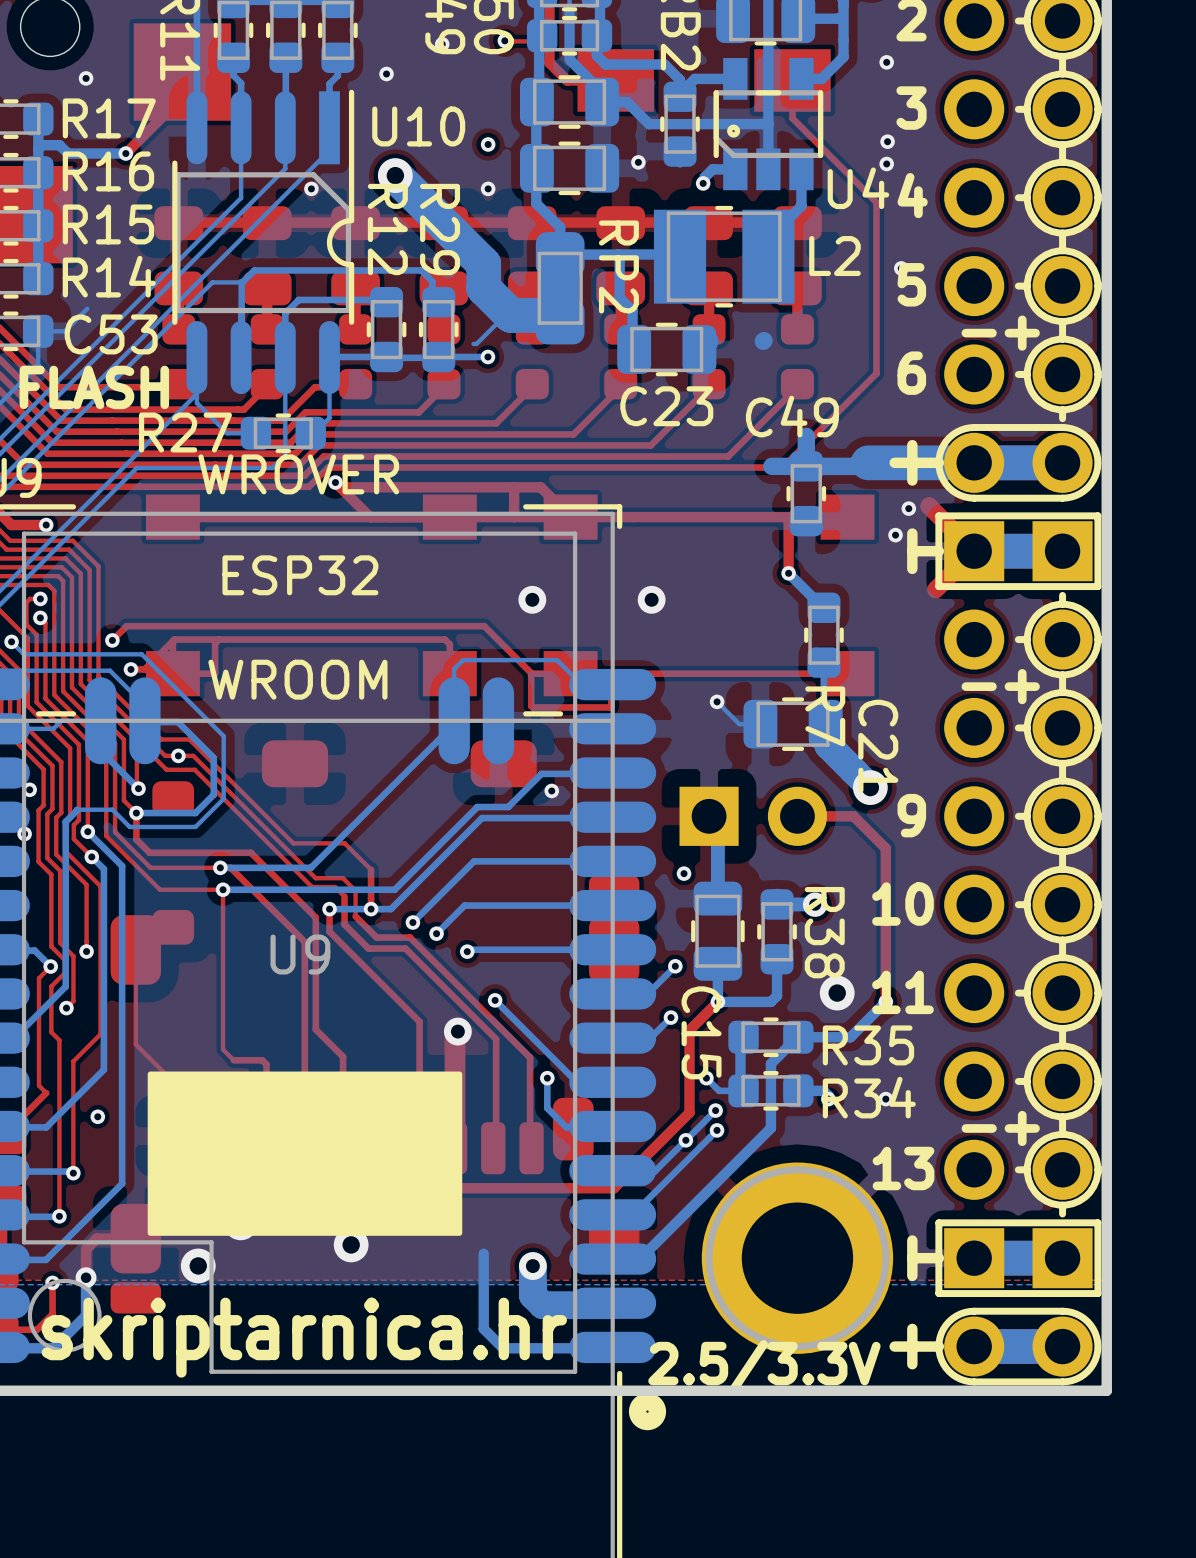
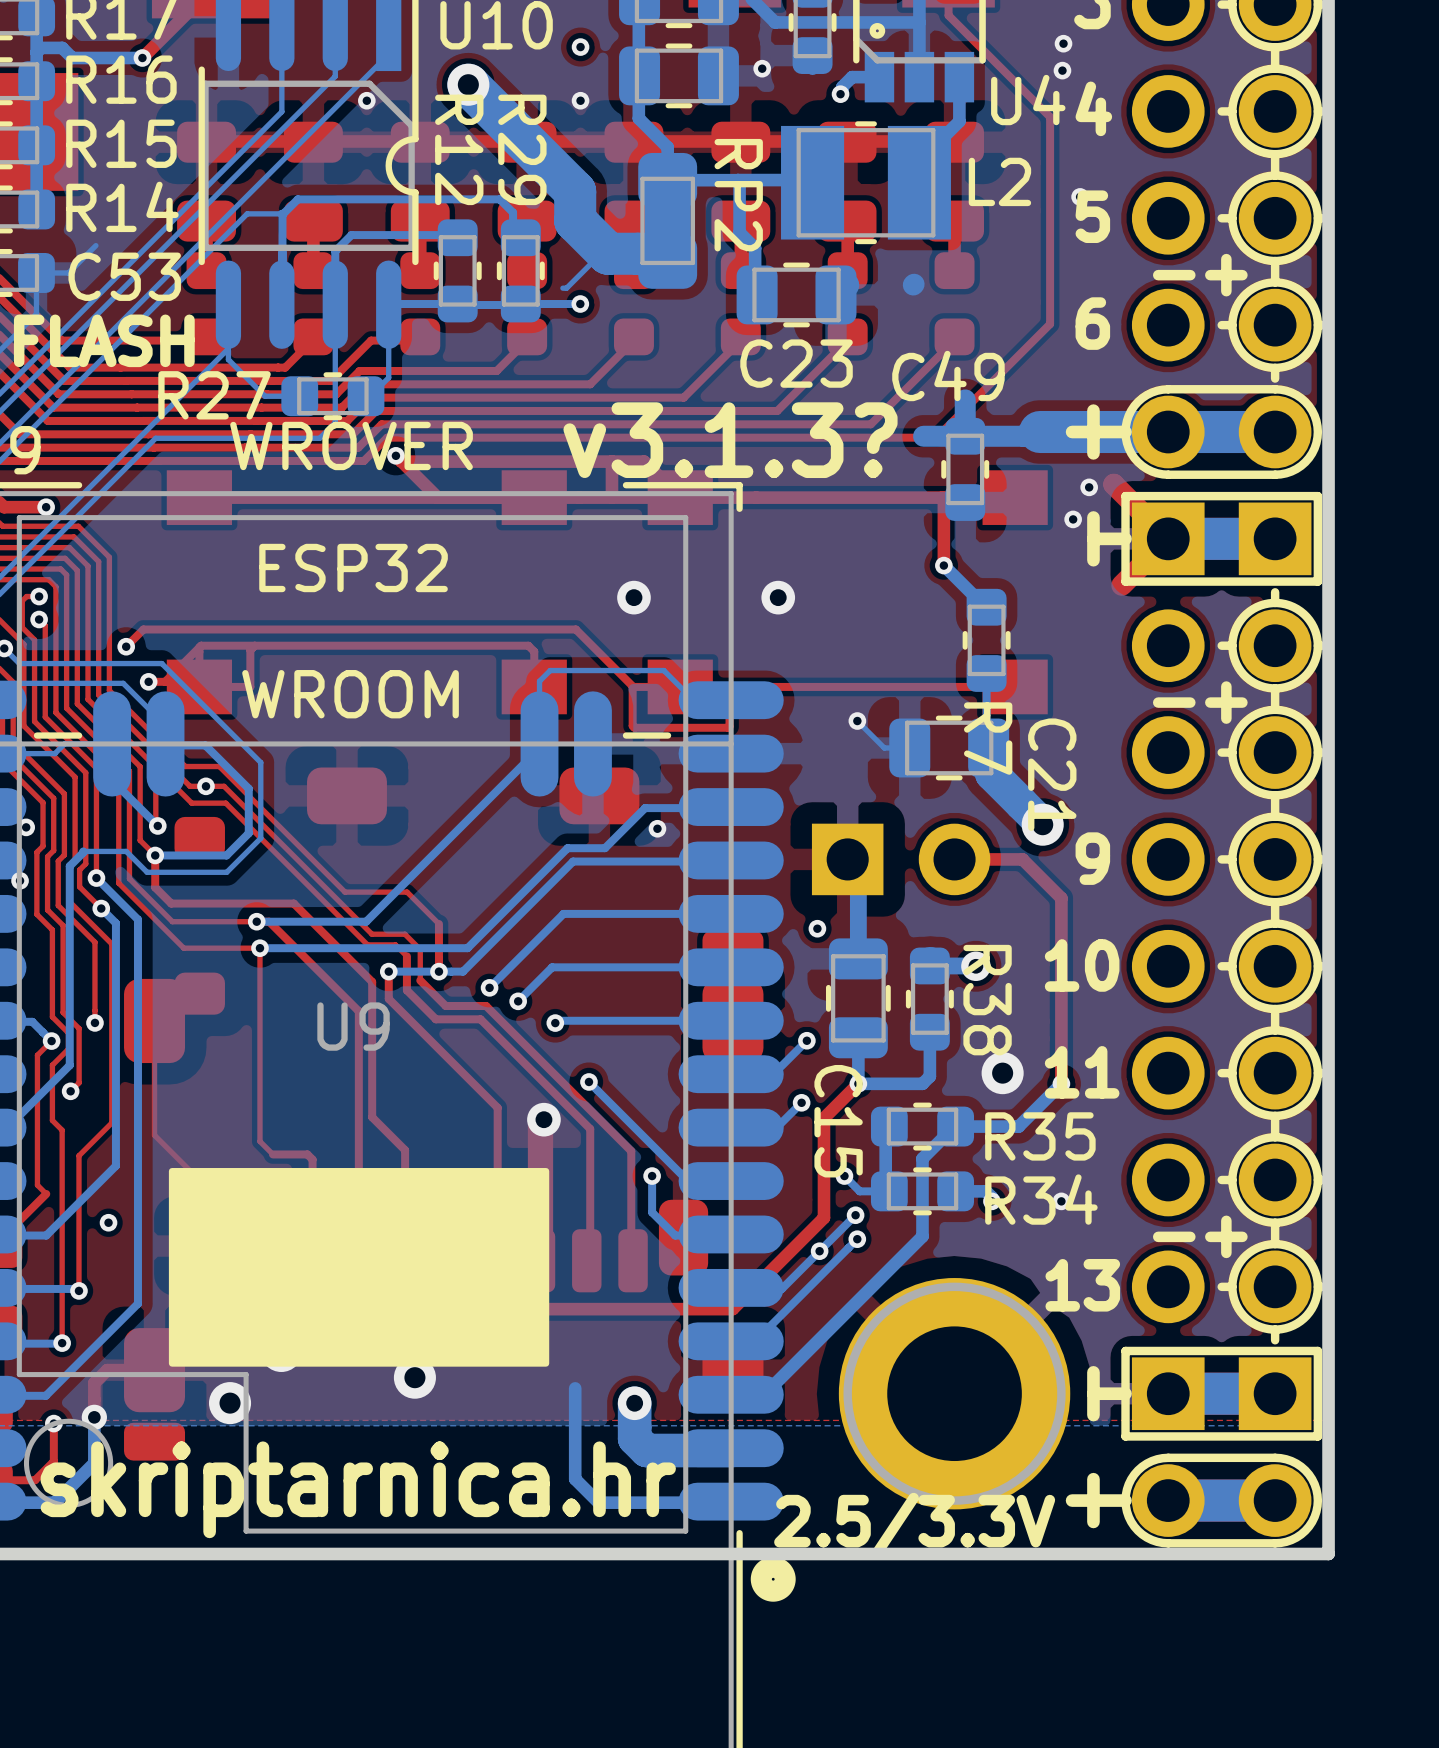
text: none -> v3.1.3? (730, 440)

